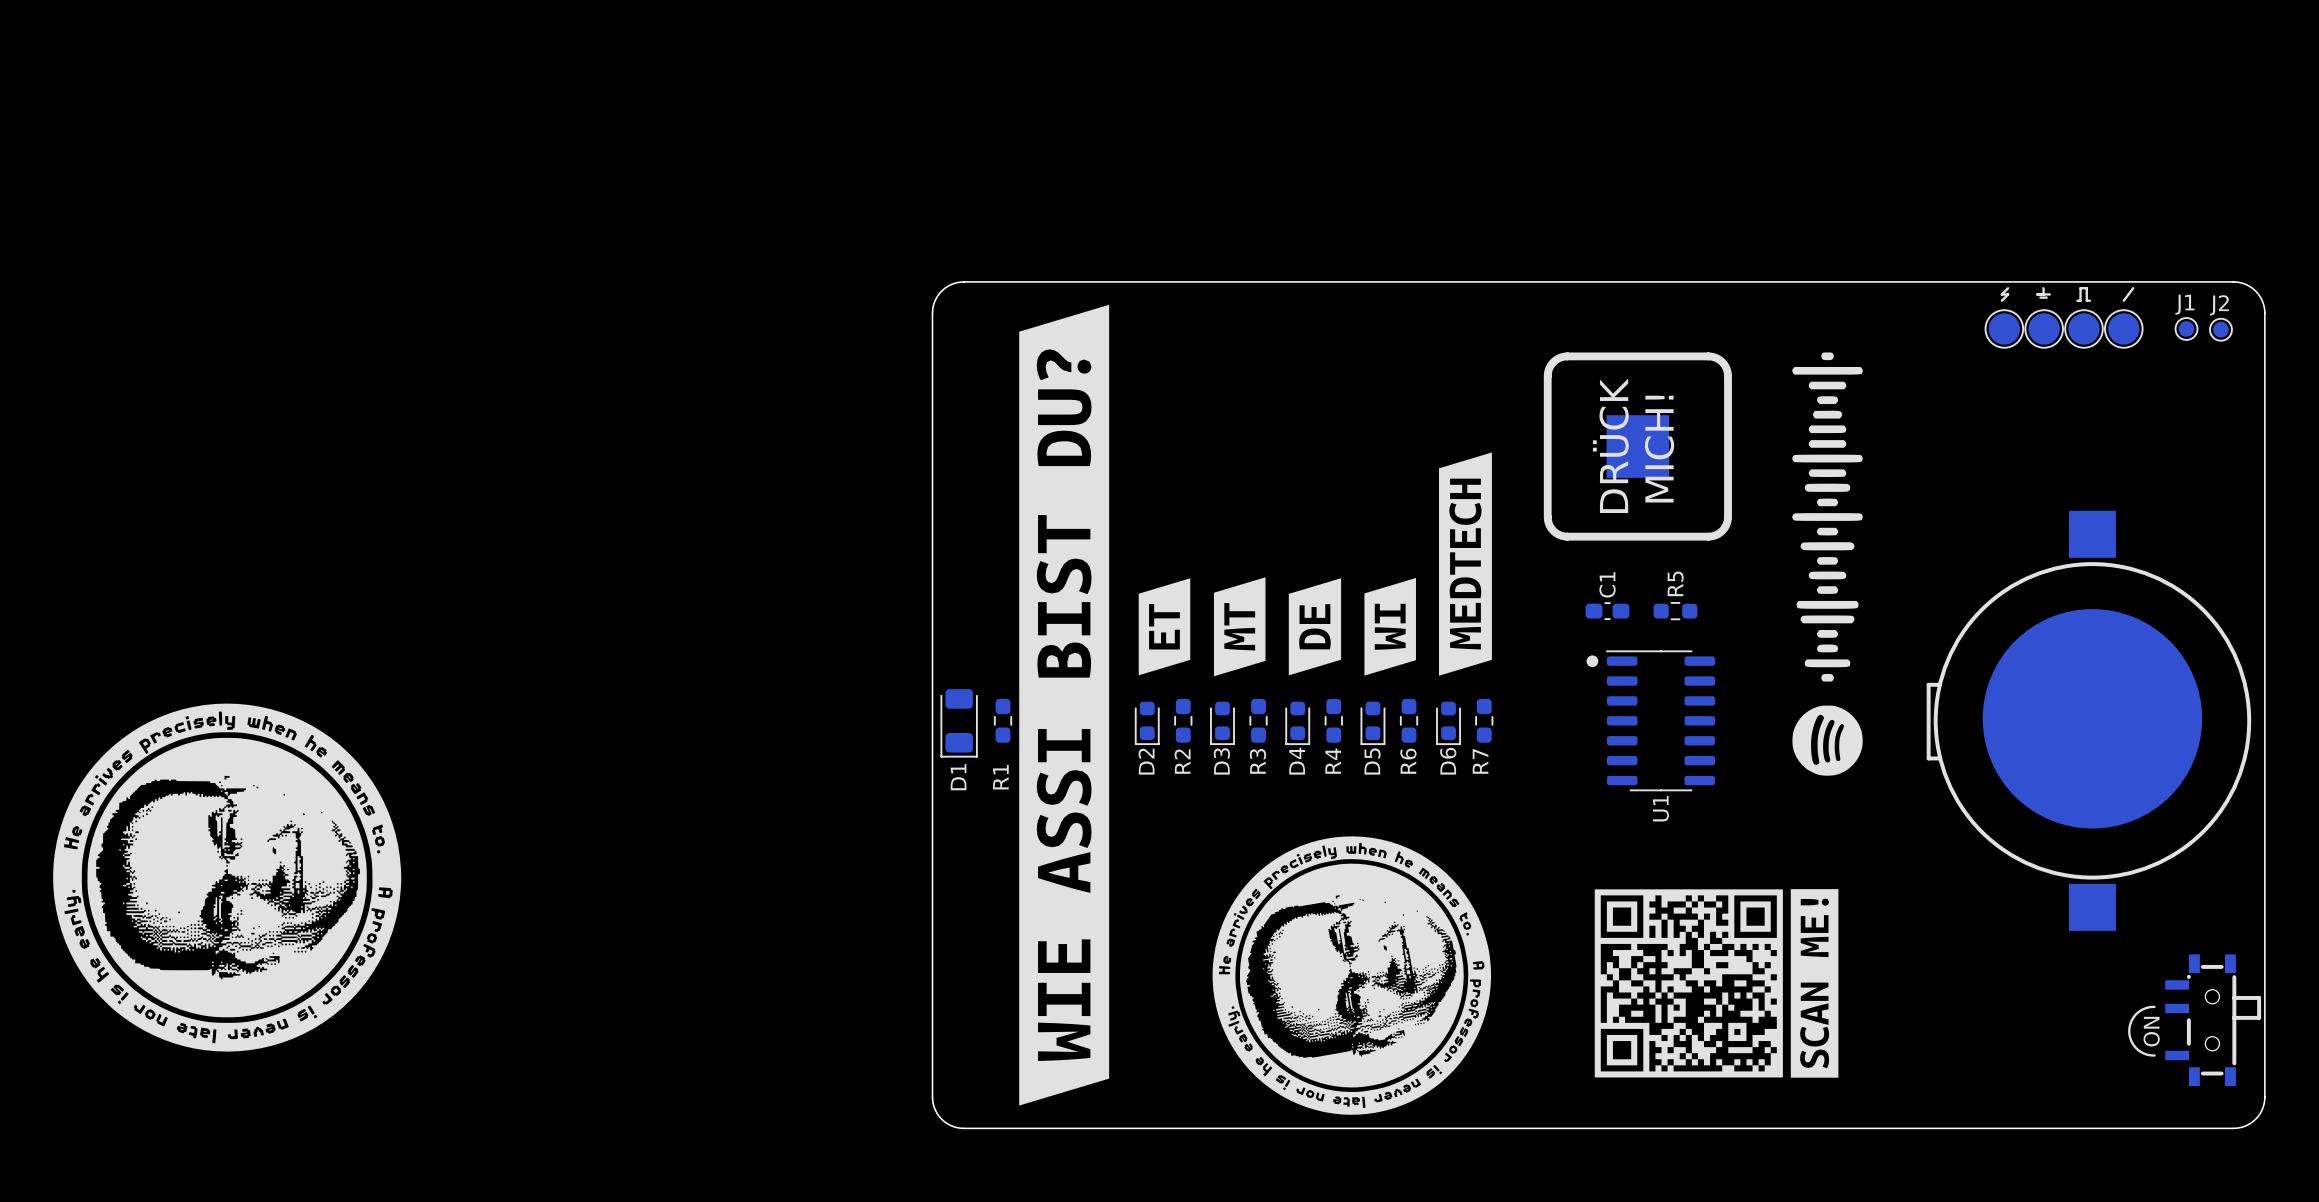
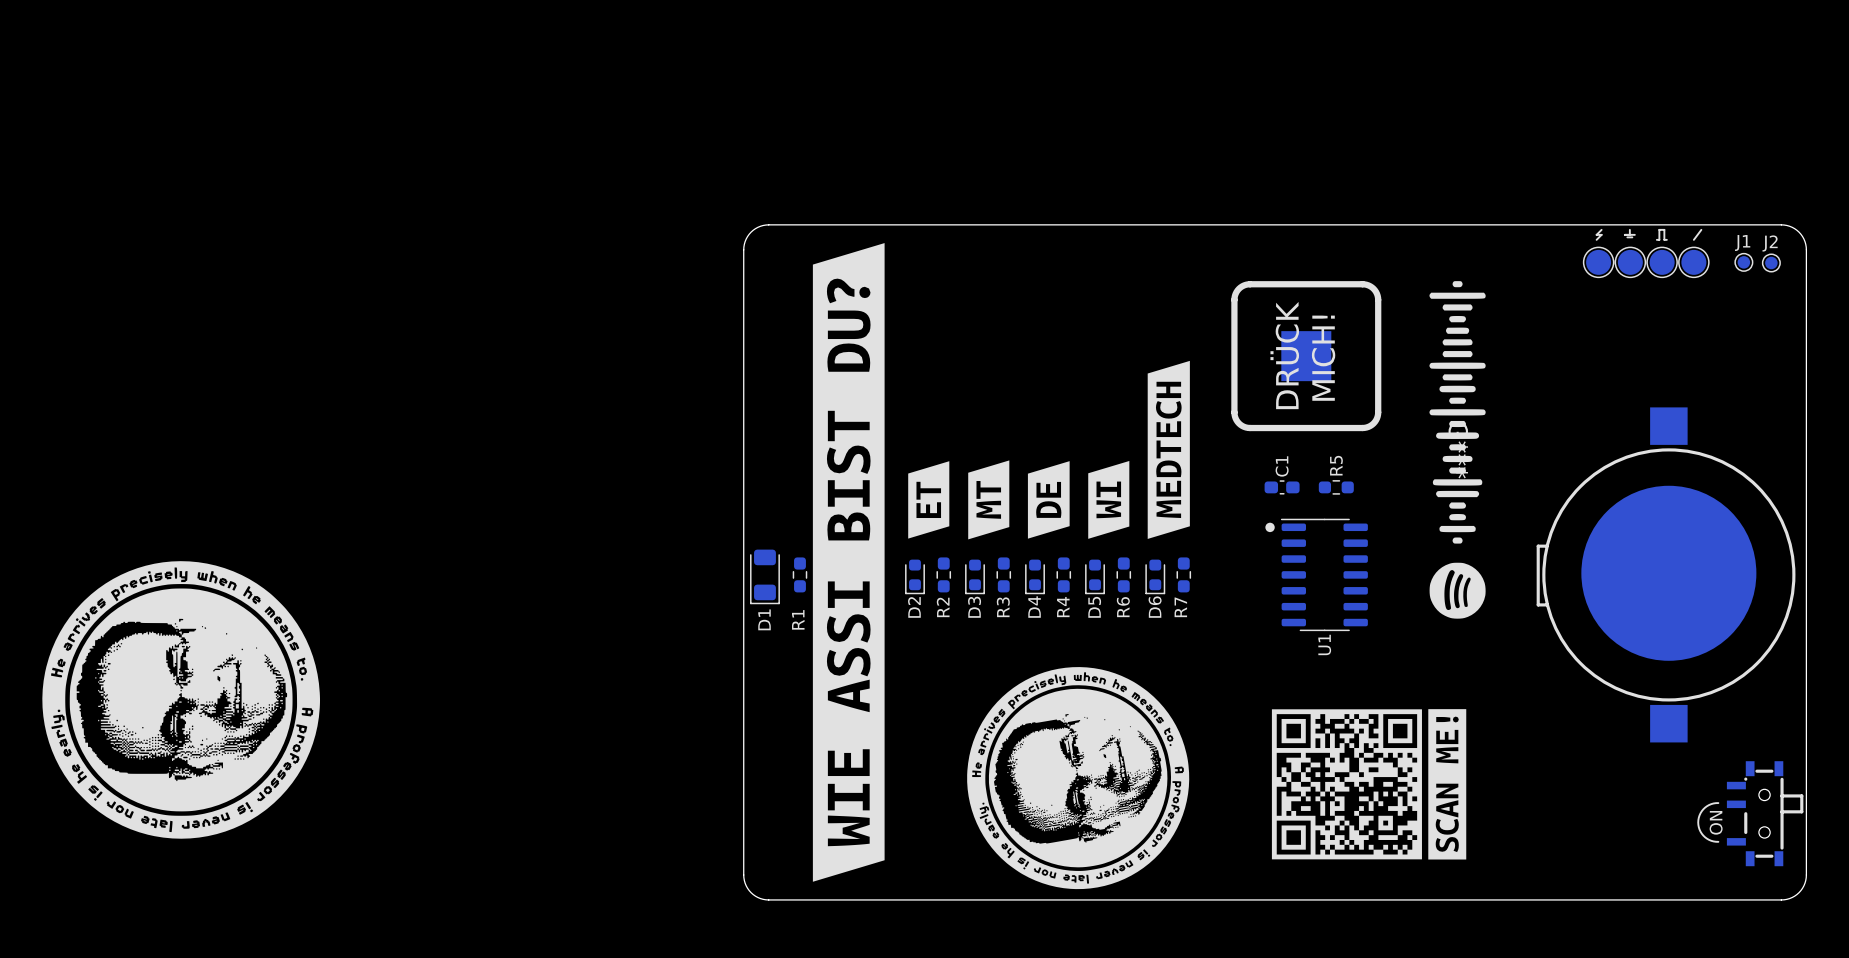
drawing: [1792, 352, 1863, 776] -> none
part: none -> (1457, 449)

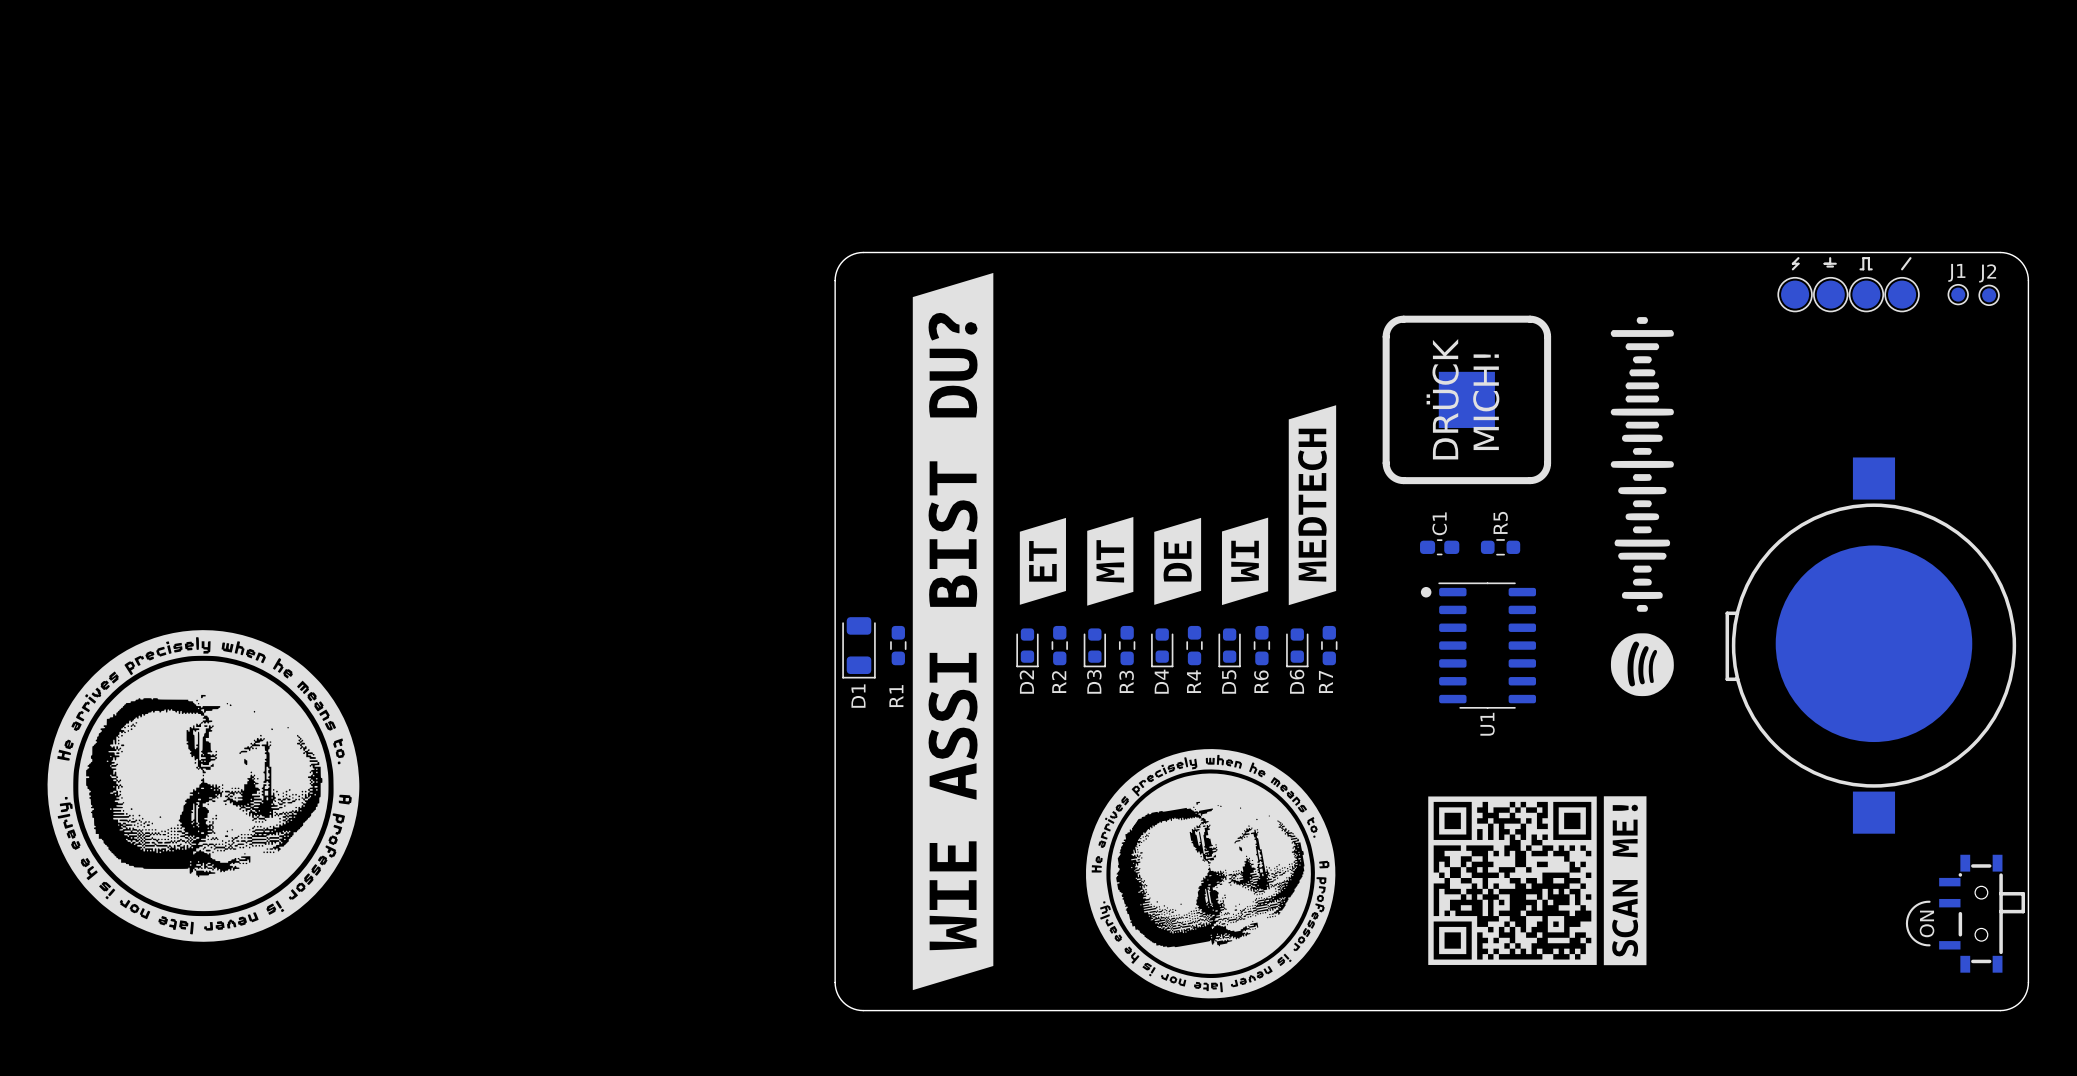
drawing: none -> [1610, 317, 1674, 697]
part: (1457, 449) -> none

